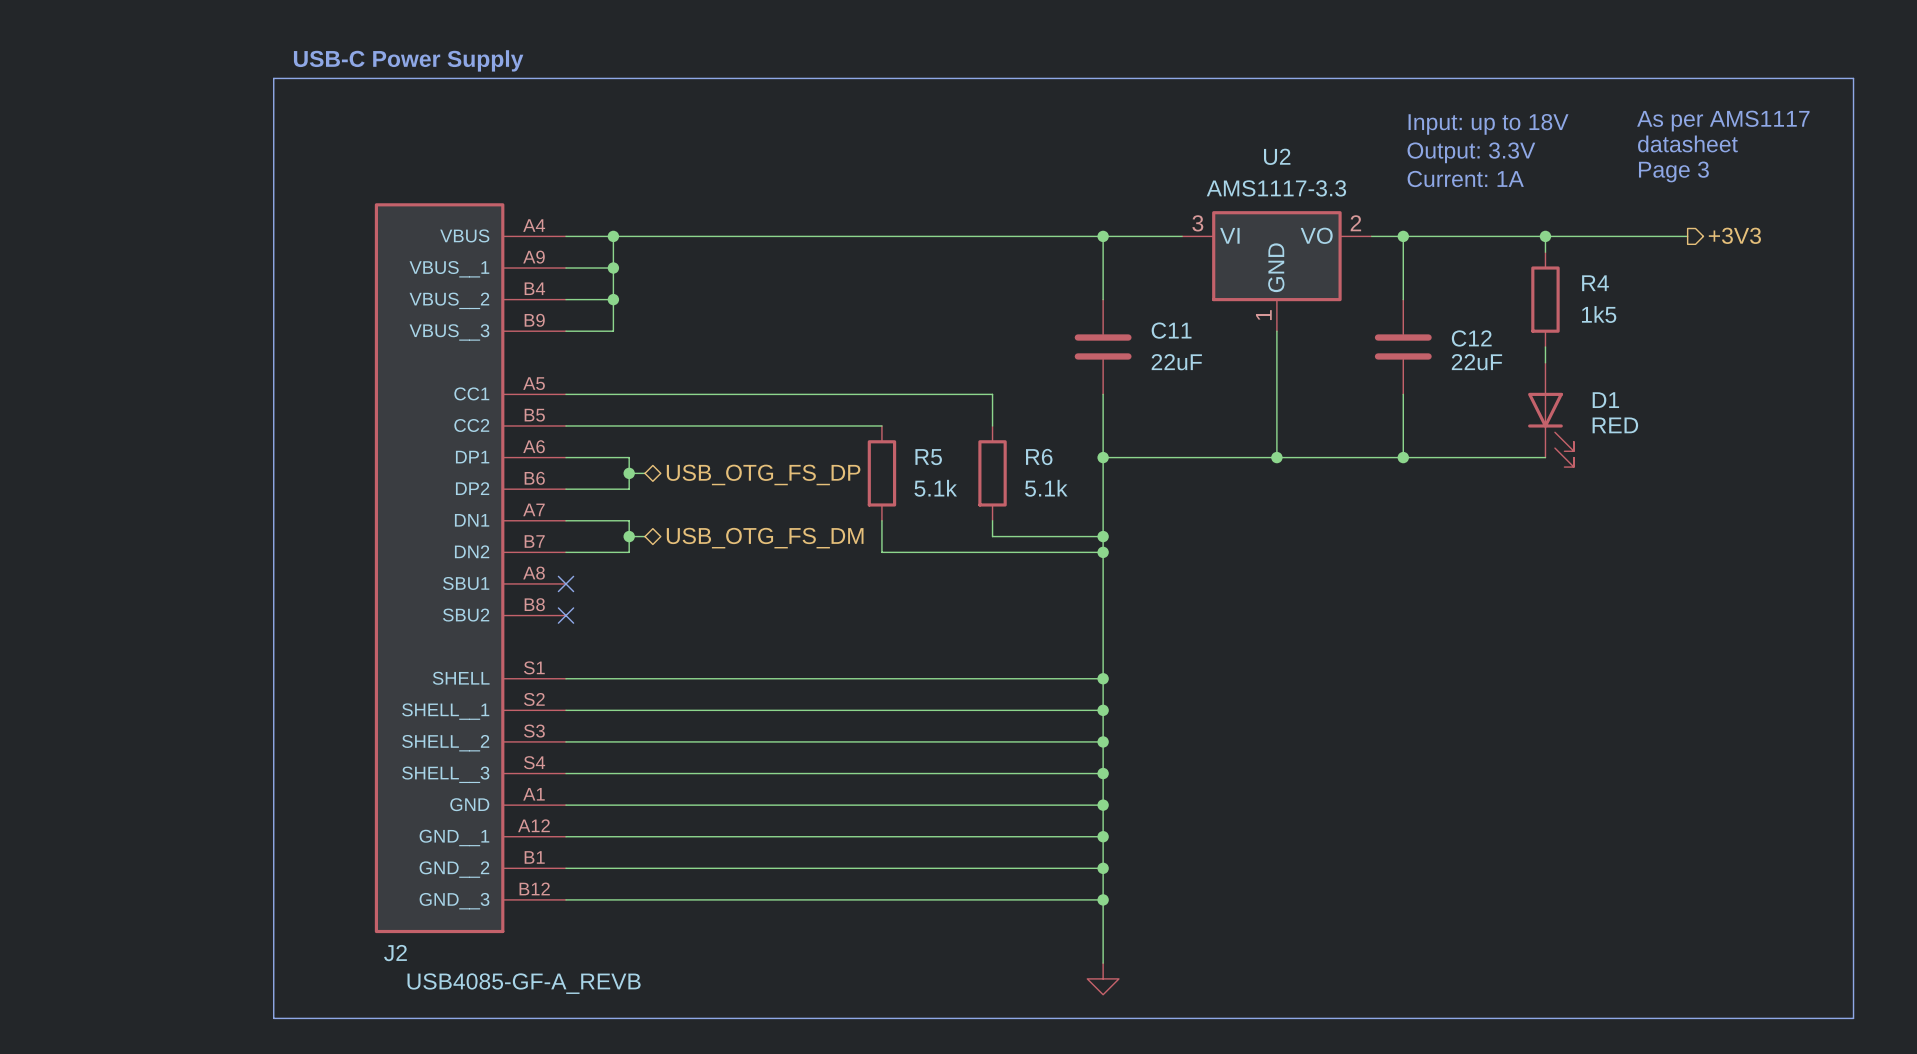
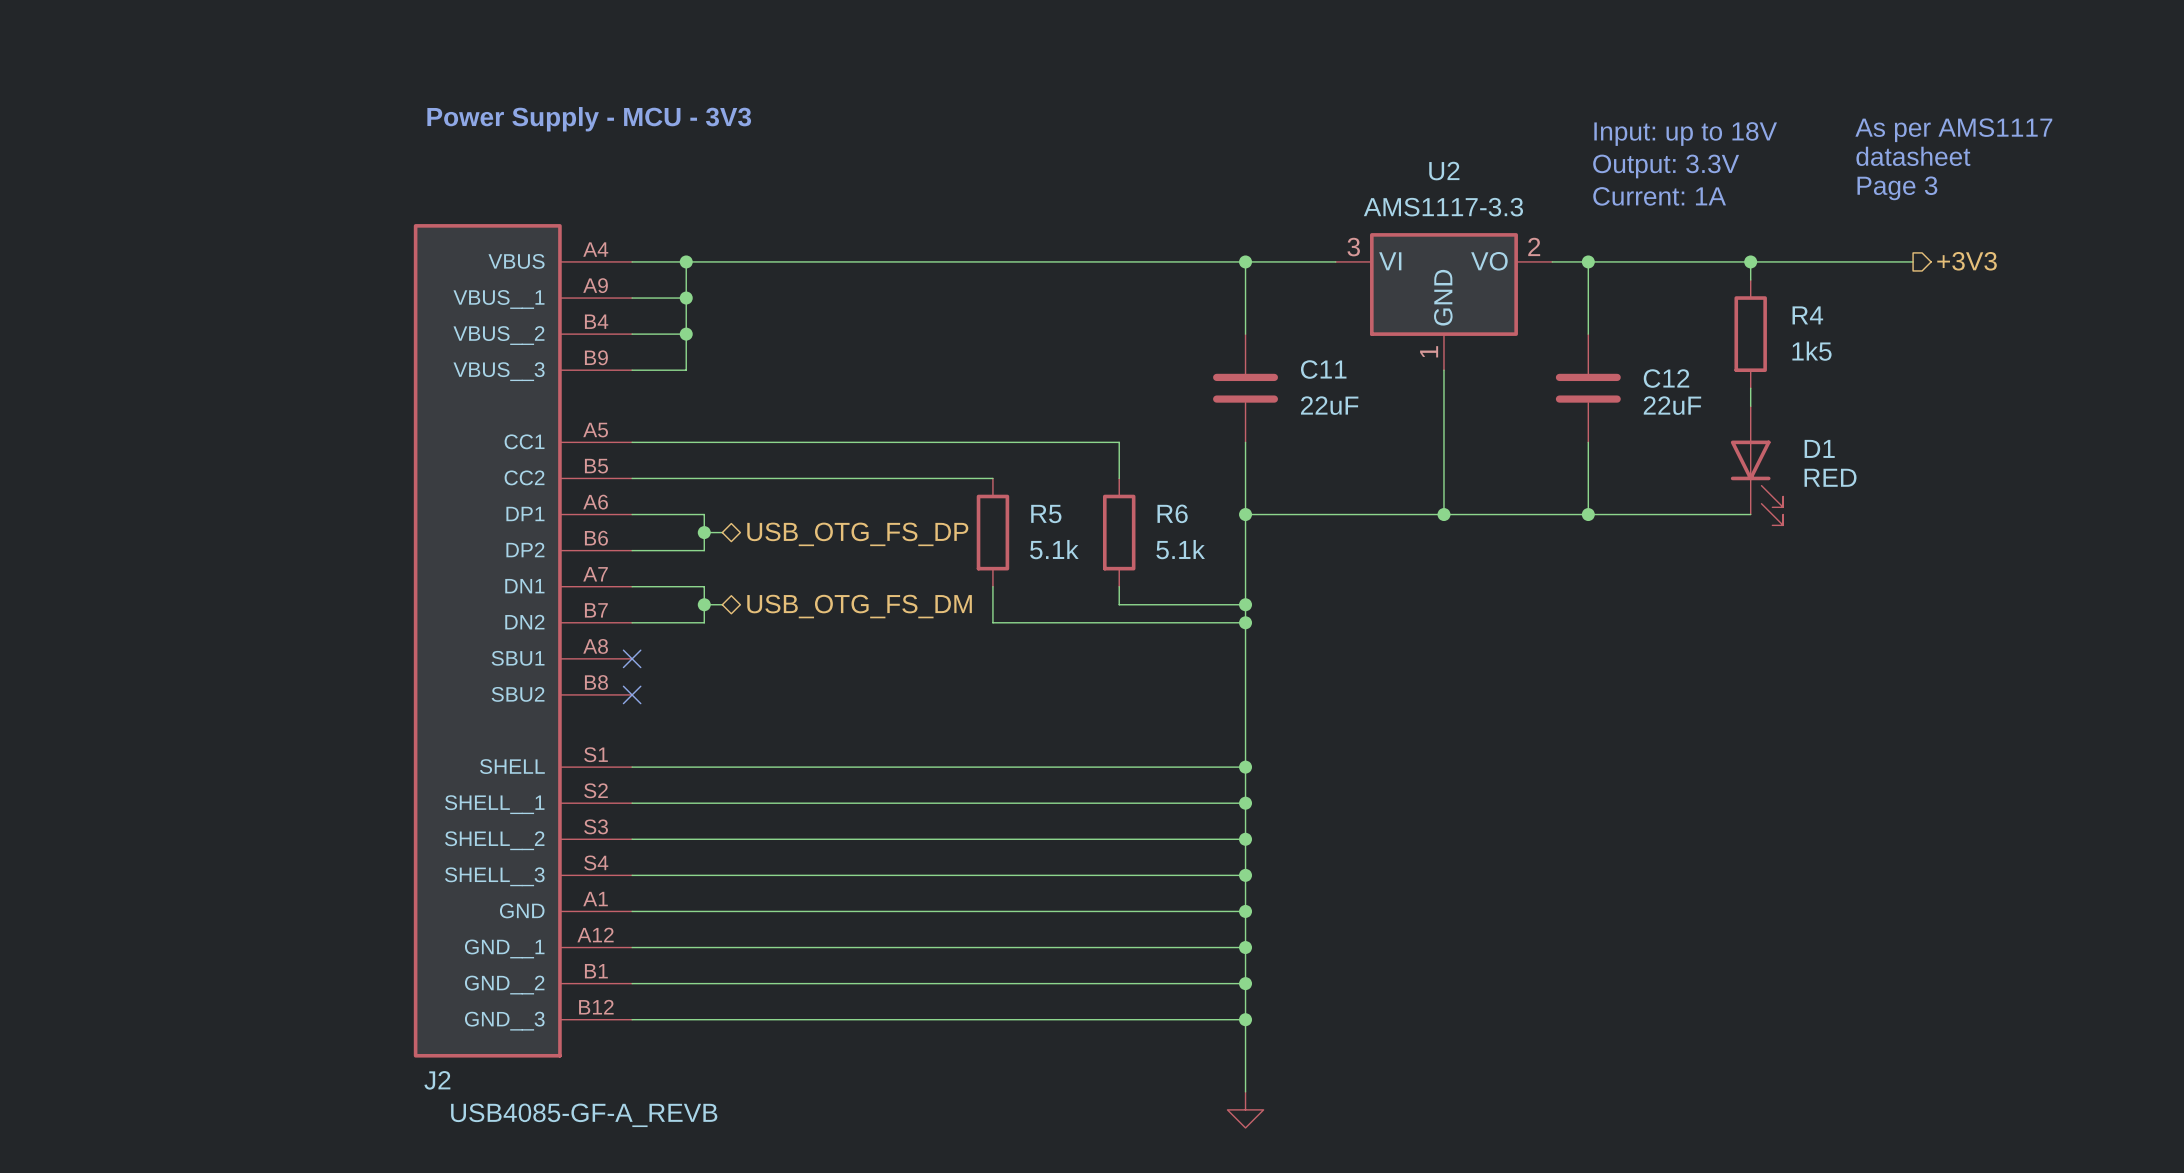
text: USB-C Power Supply (408, 60) -> none
line: (273, 78) (1853, 78) (1853, 1018) (273, 1018) (273, 78) -> none
text: none -> Power Supply - MCU - 3V3 (589, 119)

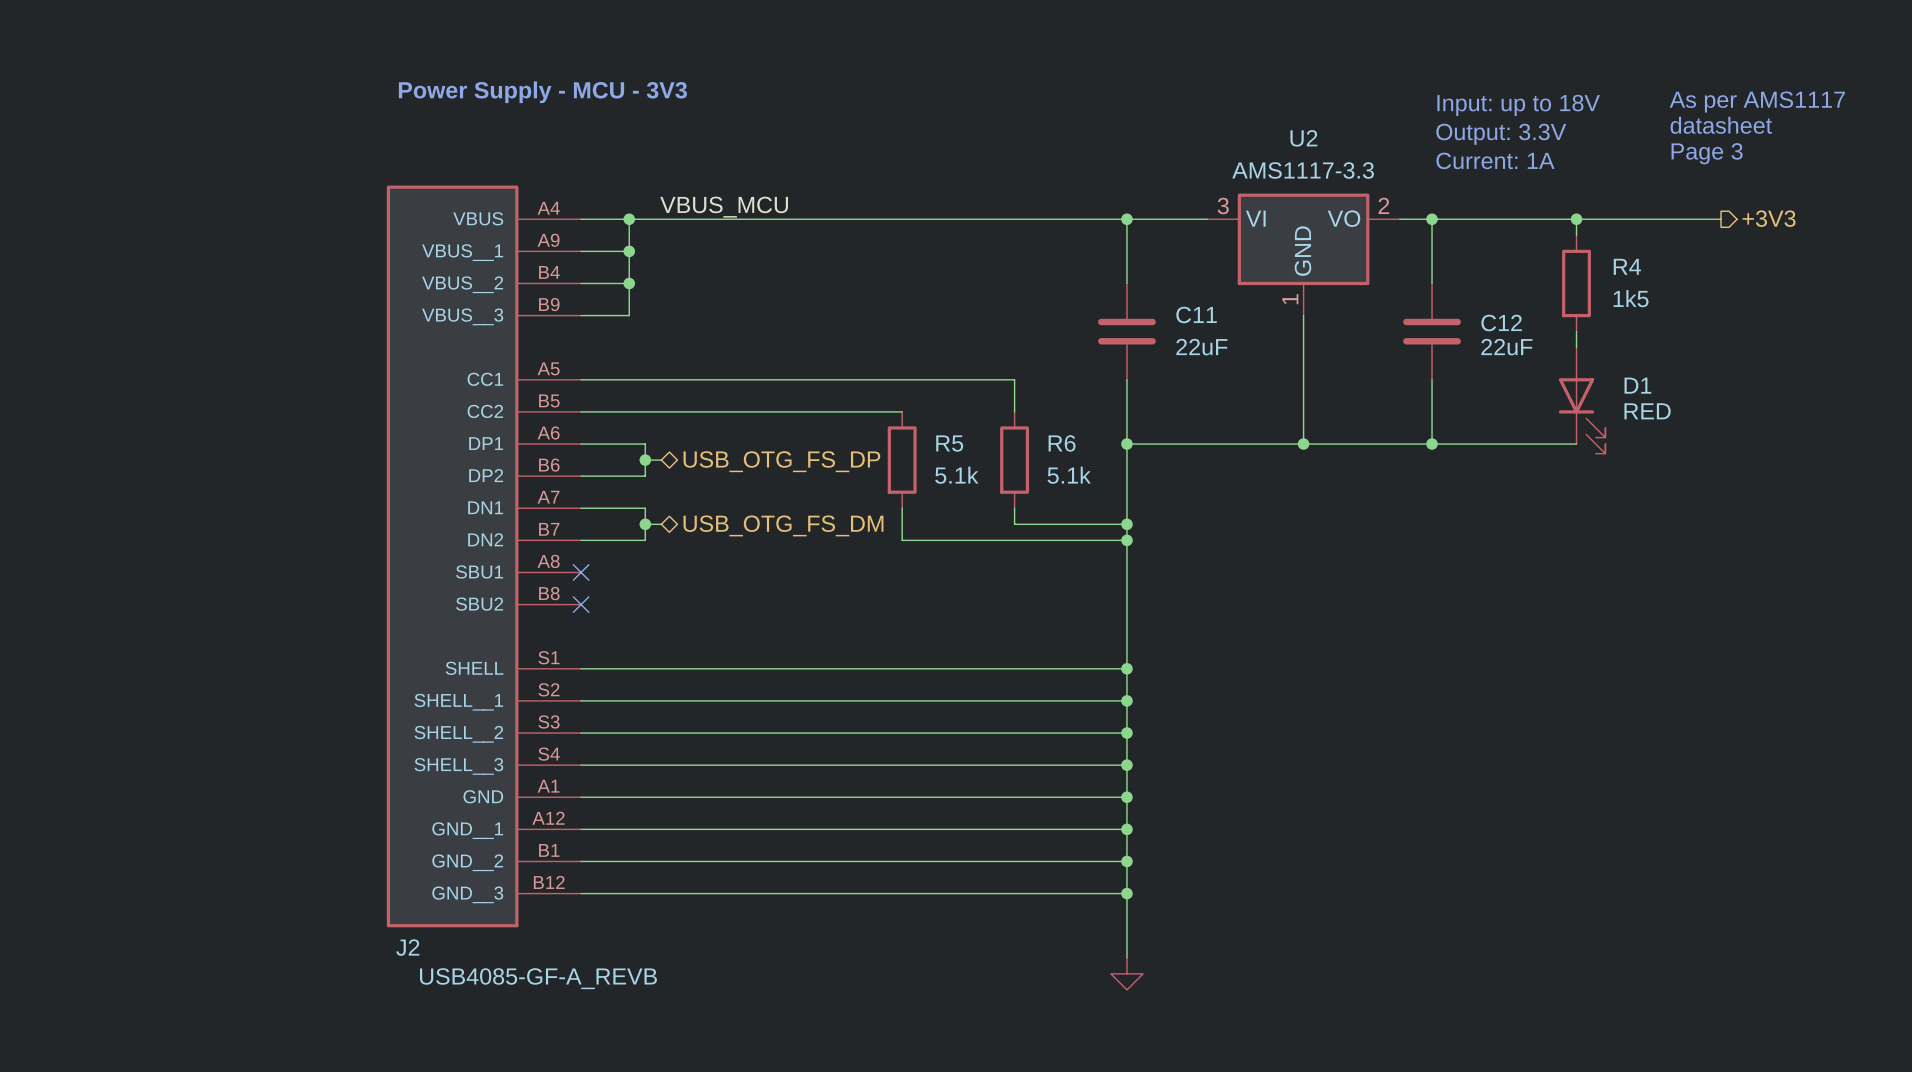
label: none -> VBUS_MCU (724, 207)

